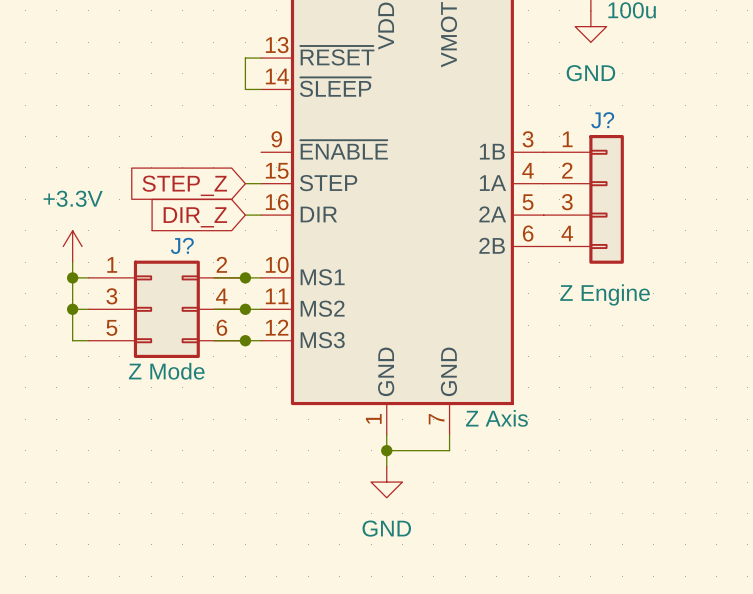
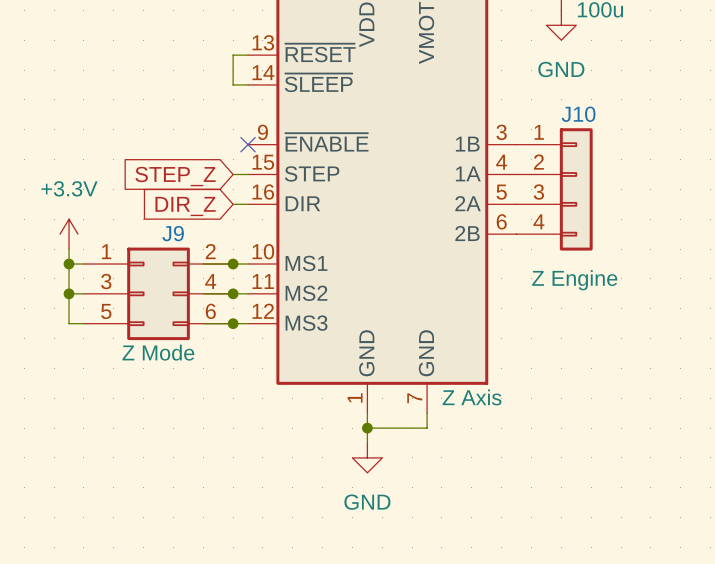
J? name: J? (602, 120) -> J10 (578, 114)
no-connect mark: none -> (248, 144)
J? name: J? (182, 245) -> J9 (173, 233)

